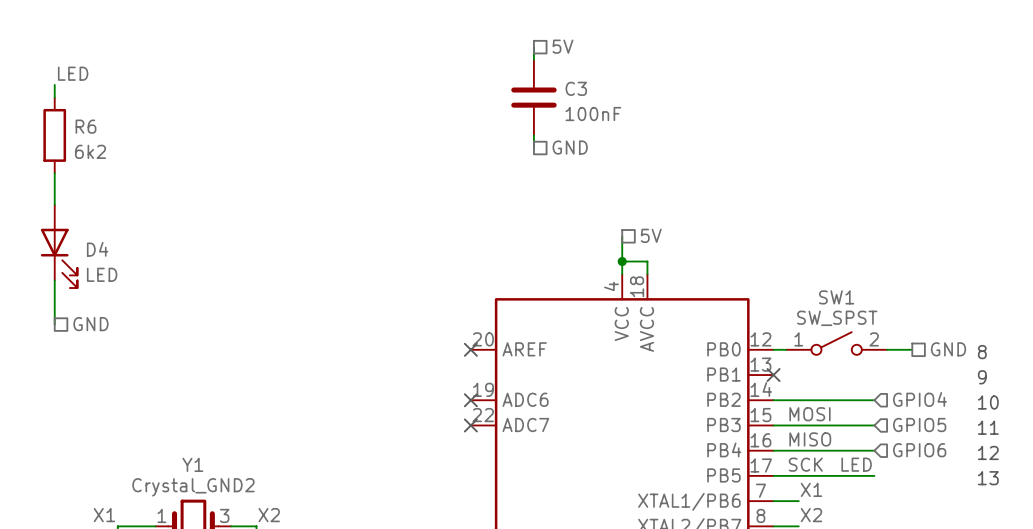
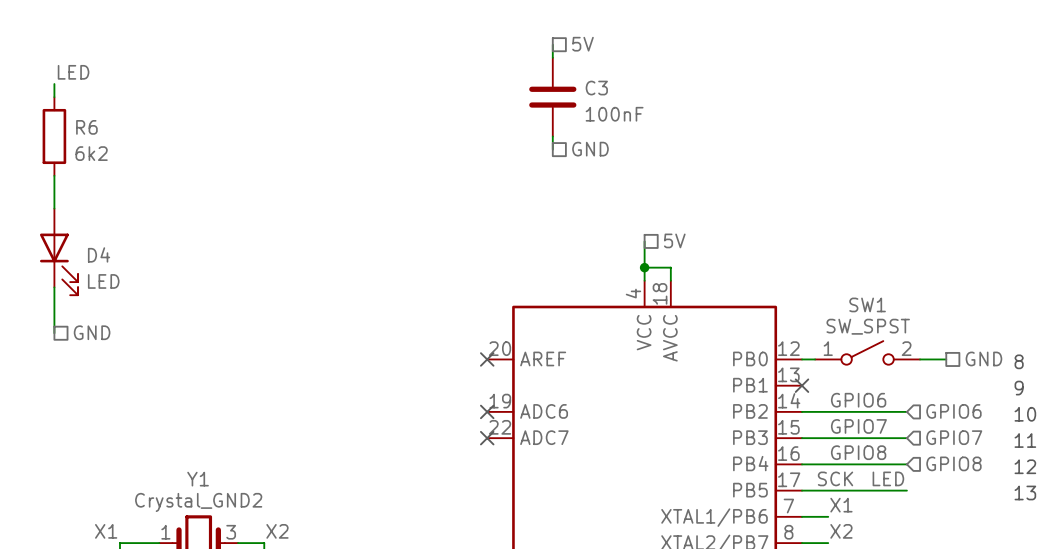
label: none -> GPIO6 (858, 400)
hierarchical label: GPIO4 (919, 399) -> GPIO6 (953, 411)
label: MOSI (809, 414) -> none
label: none -> GPIO7 (858, 426)
hierarchical label: GPIO5 (919, 425) -> GPIO7 (954, 437)
label: MISO (810, 439) -> none
label: none -> GPIO8 (858, 452)
hierarchical label: GPIO6 (919, 450) -> GPIO8 (953, 463)

